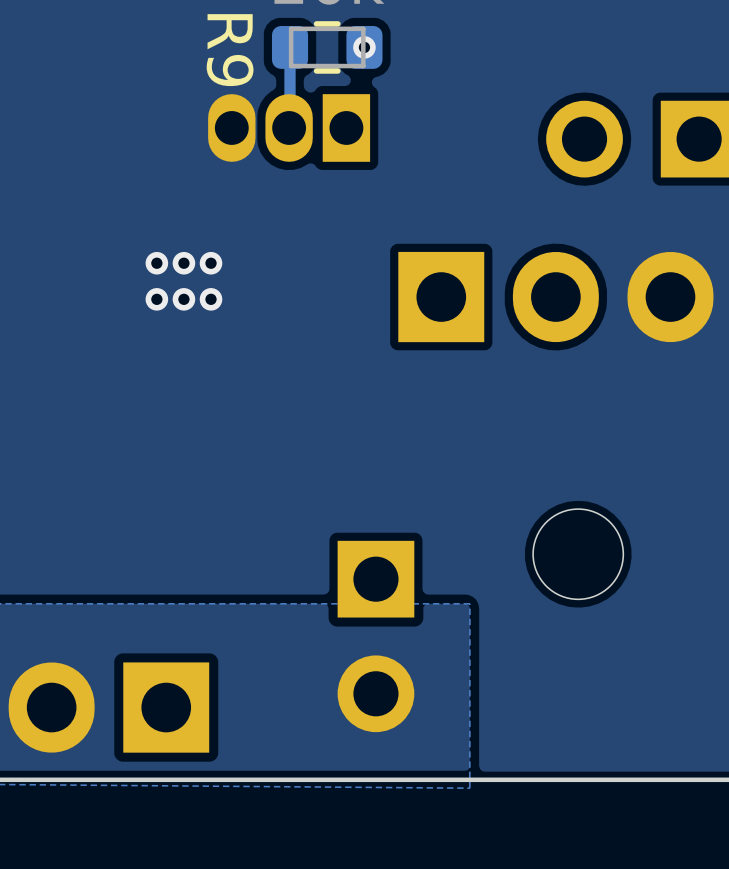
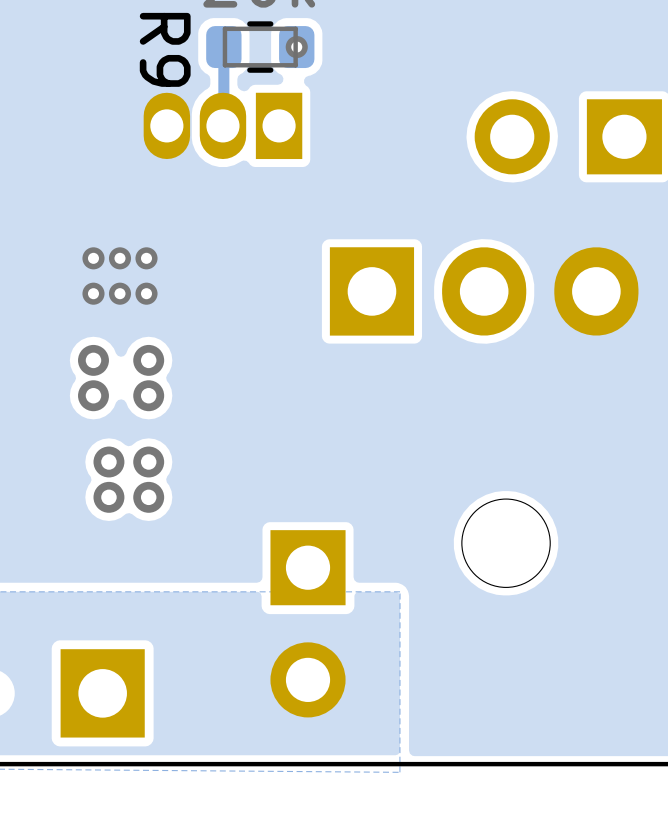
via: none -> (93, 360)
via: none -> (148, 360)
via: none -> (93, 395)
via: none -> (148, 395)
via: none -> (108, 461)
via: none -> (148, 461)
via: none -> (108, 497)
via: none -> (148, 497)

